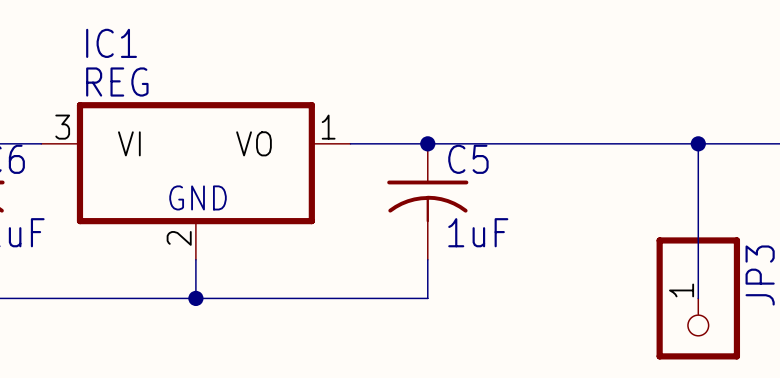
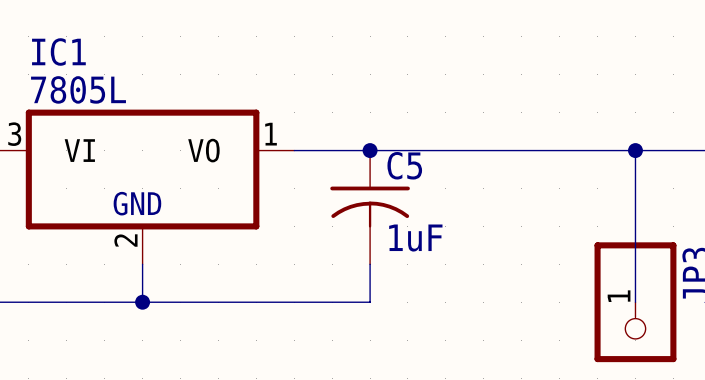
IC1 value: REG (117, 82) -> 7805L (78, 89)

